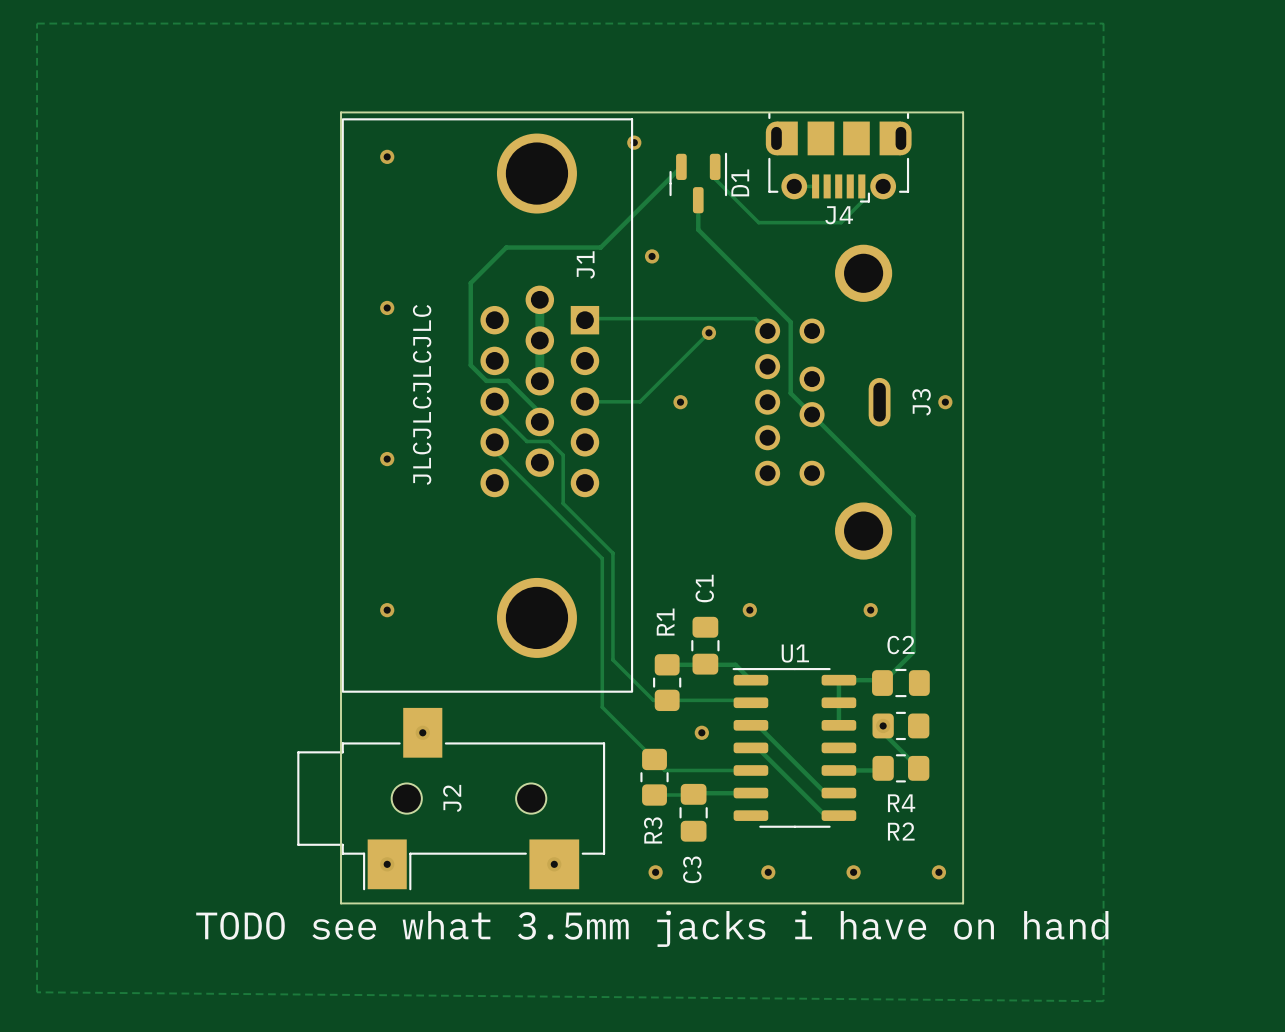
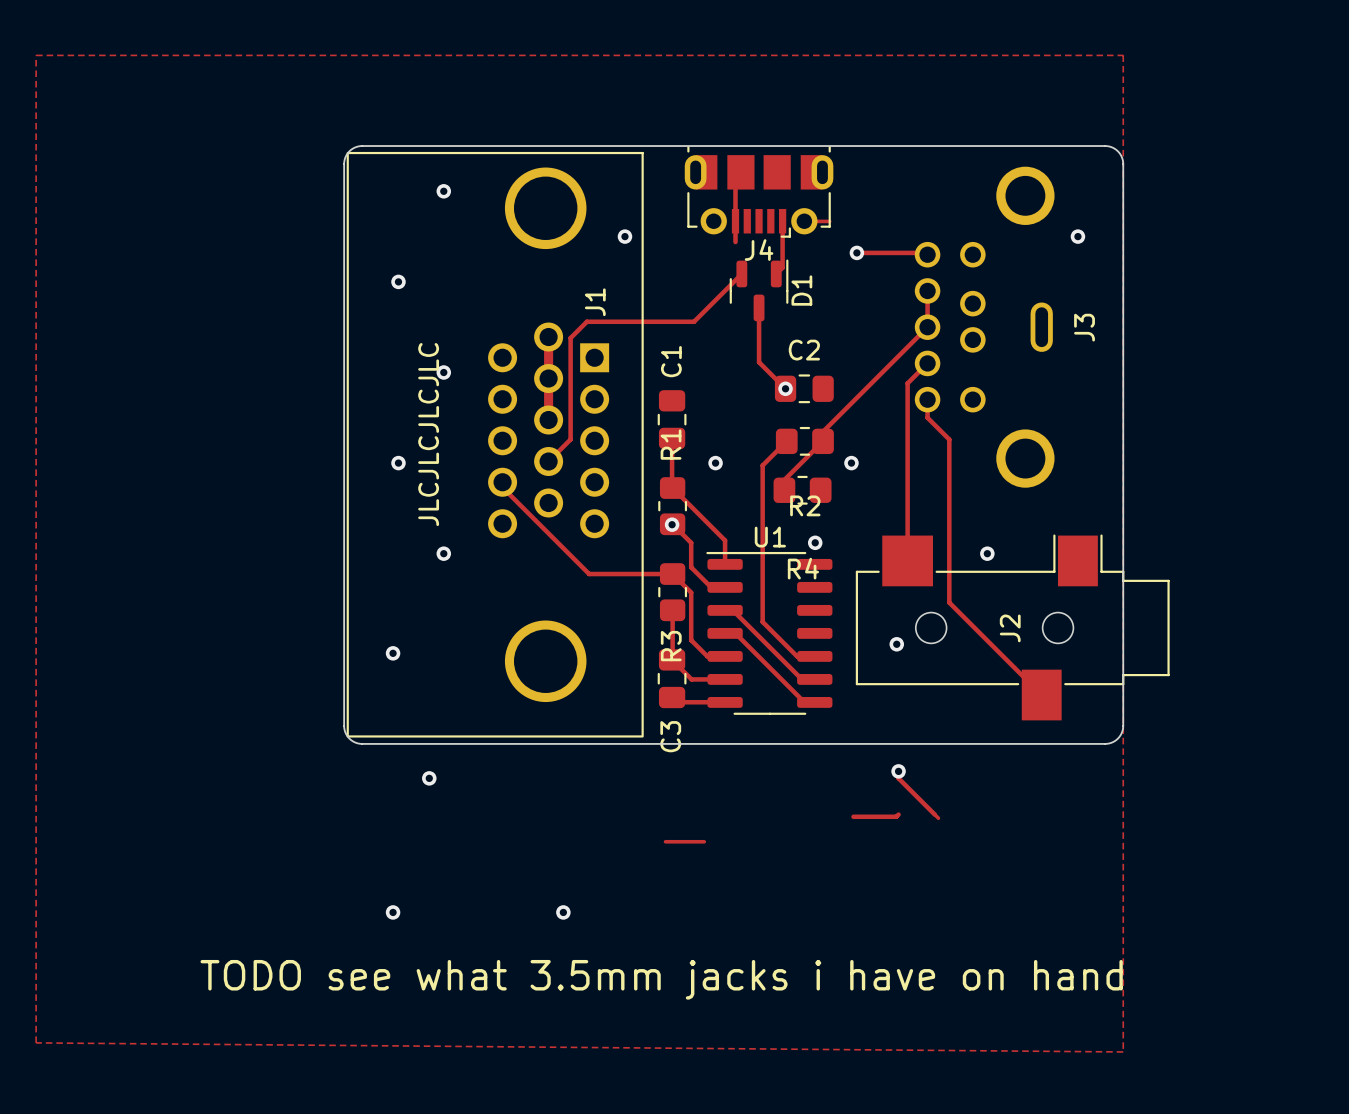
board edge: (356, 112) (341, 112) (341, 903) (963, 903) (963, 112) -> (362, 146) (349, 151) (344, 164) (344, 725) (345, 733) (350, 739) (362, 743) (1109, 743) (1119, 737) (1123, 725) (1122, 160) (1116, 149) (1107, 146) (980, 146)
J4 footprint: [765, 112, 912, 203] -> [684, 145, 834, 238]
track: none -> (740, 172) (735, 177) (735, 242)
via: (634, 142) -> none
via: (387, 156) -> none
via: none -> (443, 191)
track: (681, 166) (600, 247) (506, 247) (470, 283) (470, 365) (486, 380) (508, 380) (539, 412) (539, 421) -> (741, 273) (694, 321) (586, 321) (570, 338) (570, 439) (548, 461)
track: (715, 166) (715, 179) (758, 222) (841, 222) (861, 201) (861, 186) -> none
D1 position: (698, 183) -> (759, 290)
track: none -> (782, 221) (782, 267) (776, 273)
track: (698, 200) (698, 229) (790, 322) (790, 393) (913, 515) (913, 652) (882, 683) (879, 680) (838, 680) (838, 725) -> none
via: none -> (624, 236)
via: none -> (1077, 236)
track: none -> (856, 252) (925, 252) (927, 254)
via: none -> (856, 252)
via: none -> (398, 281)
track: none -> (927, 290) (927, 327) (823, 431) (823, 441) (784, 479) (784, 490)
via: (652, 256) -> none
track: none -> (759, 307) (759, 362) (785, 388)
via: (387, 307) -> none
track: (584, 320) (586, 318) (755, 318) (767, 331) -> none
track: none -> (927, 363) (907, 383) (907, 560)
track: (708, 332) (639, 401) (584, 401) -> none
via: (708, 332) -> none
via: none -> (443, 372)
via: none -> (785, 388)
track: none -> (927, 399) (927, 417) (949, 439) (949, 602) (1041, 695)
track: none -> (672, 438) (672, 487) (725, 540) (725, 564)
track: (494, 401) (494, 408) (526, 441) (549, 441) (563, 455) (563, 503) (612, 553) (612, 659) (653, 700) (748, 700) (750, 702) -> none
via position: (680, 402) -> (715, 463)
track: none -> (786, 441) (762, 465) (762, 621) (797, 656) (814, 656)
J3 position: (823, 402) -> (984, 327)
via: (945, 402) -> none
via: none -> (851, 463)
track: (494, 442) (494, 450) (602, 558) (602, 707) (664, 770) (750, 770) -> (502, 482) (502, 487) (589, 574) (672, 574) (691, 592) (691, 640) (707, 656) (725, 656)
via position: (387, 459) -> (398, 463)
via: none -> (672, 524)
track: none -> (672, 524) (691, 542) (691, 567) (711, 587) (725, 587)
via: none -> (815, 542)
via: none -> (443, 553)
via: none -> (987, 553)
track: none -> (672, 610) (672, 659) (691, 679) (725, 679)
track: none -> (725, 610) (732, 610) (801, 679) (814, 679)
track: none -> (725, 633) (735, 633) (804, 702) (814, 702)
via: (749, 610) -> none
via position: (870, 610) -> (896, 644)
C1 position: (705, 645) -> (672, 419)
track: none -> (672, 697) (676, 702) (724, 702)
track: (667, 664) (735, 664) (750, 680) -> none
R1 position: (667, 682) -> (672, 506)
C2 position: (900, 683) -> (804, 388)
track: (750, 725) (757, 725) (825, 793) (838, 793) -> none
R4 position: (900, 725) -> (802, 490)
via: (701, 732) -> none
track: (750, 747) (757, 747) (825, 815) (838, 815) -> none
U1 position: (794, 747) -> (769, 633)
R2 position: (900, 768) -> (804, 441)
R3 position: (654, 777) -> (672, 592)
track: (750, 793) (693, 794) -> none
J2 rotation: 0° (451, 799) -> 180° (1012, 627)
J2 position: (451, 799) -> (1012, 627)
C3 position: (693, 812) -> (672, 678)
via: (655, 872) -> none
via: (768, 872) -> none
via: (853, 872) -> none
via: (938, 872) -> none

